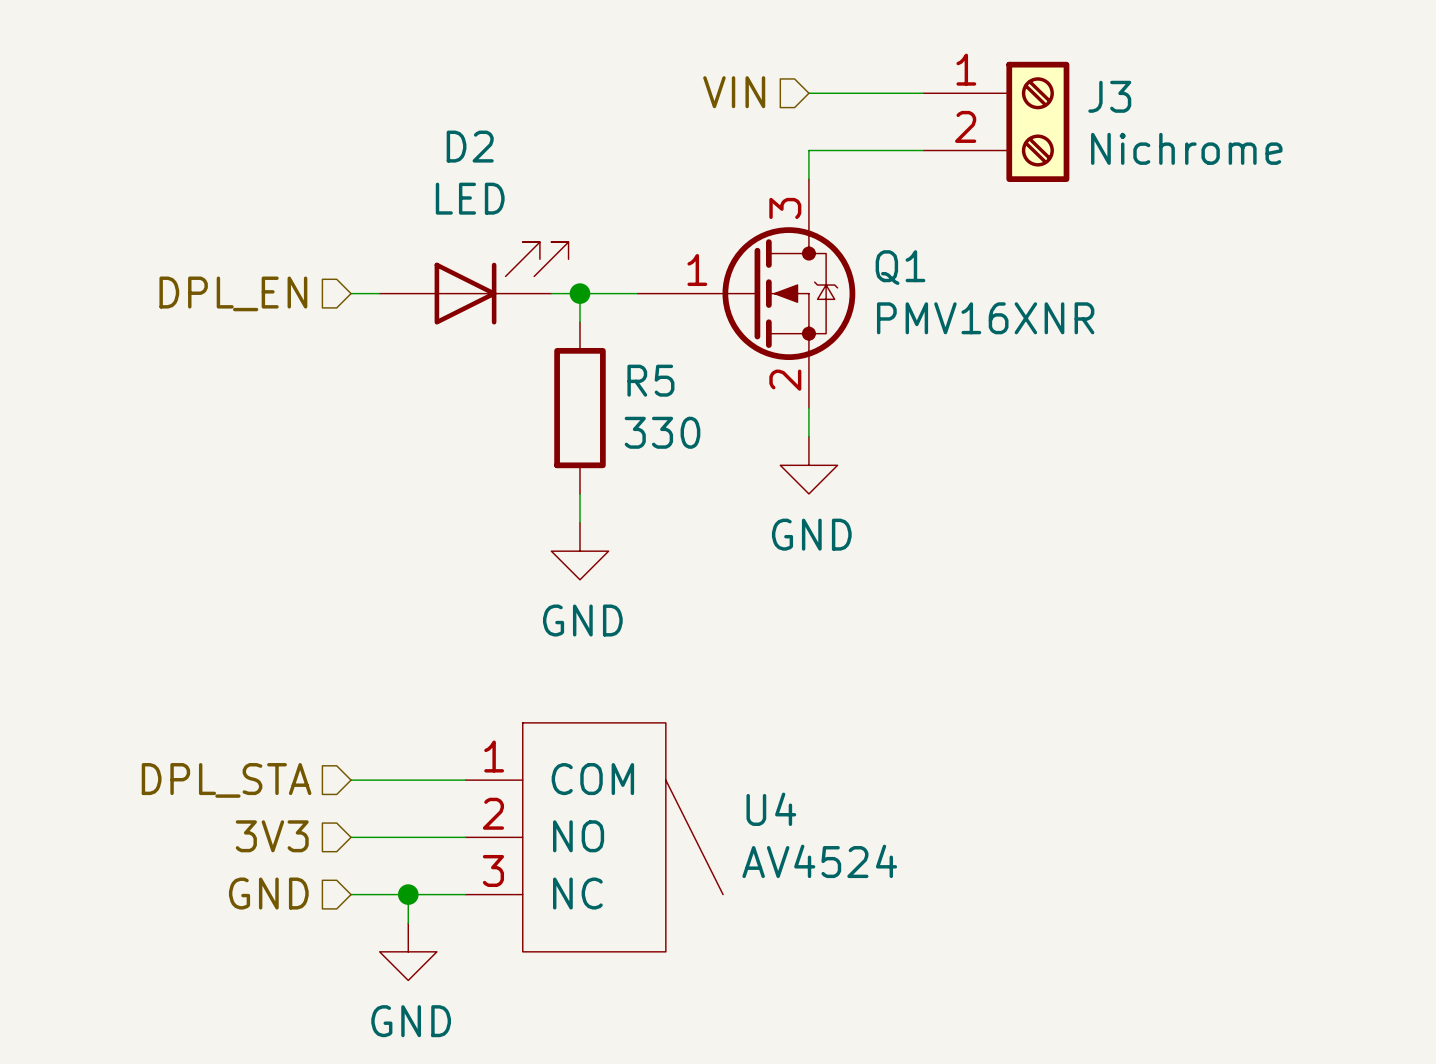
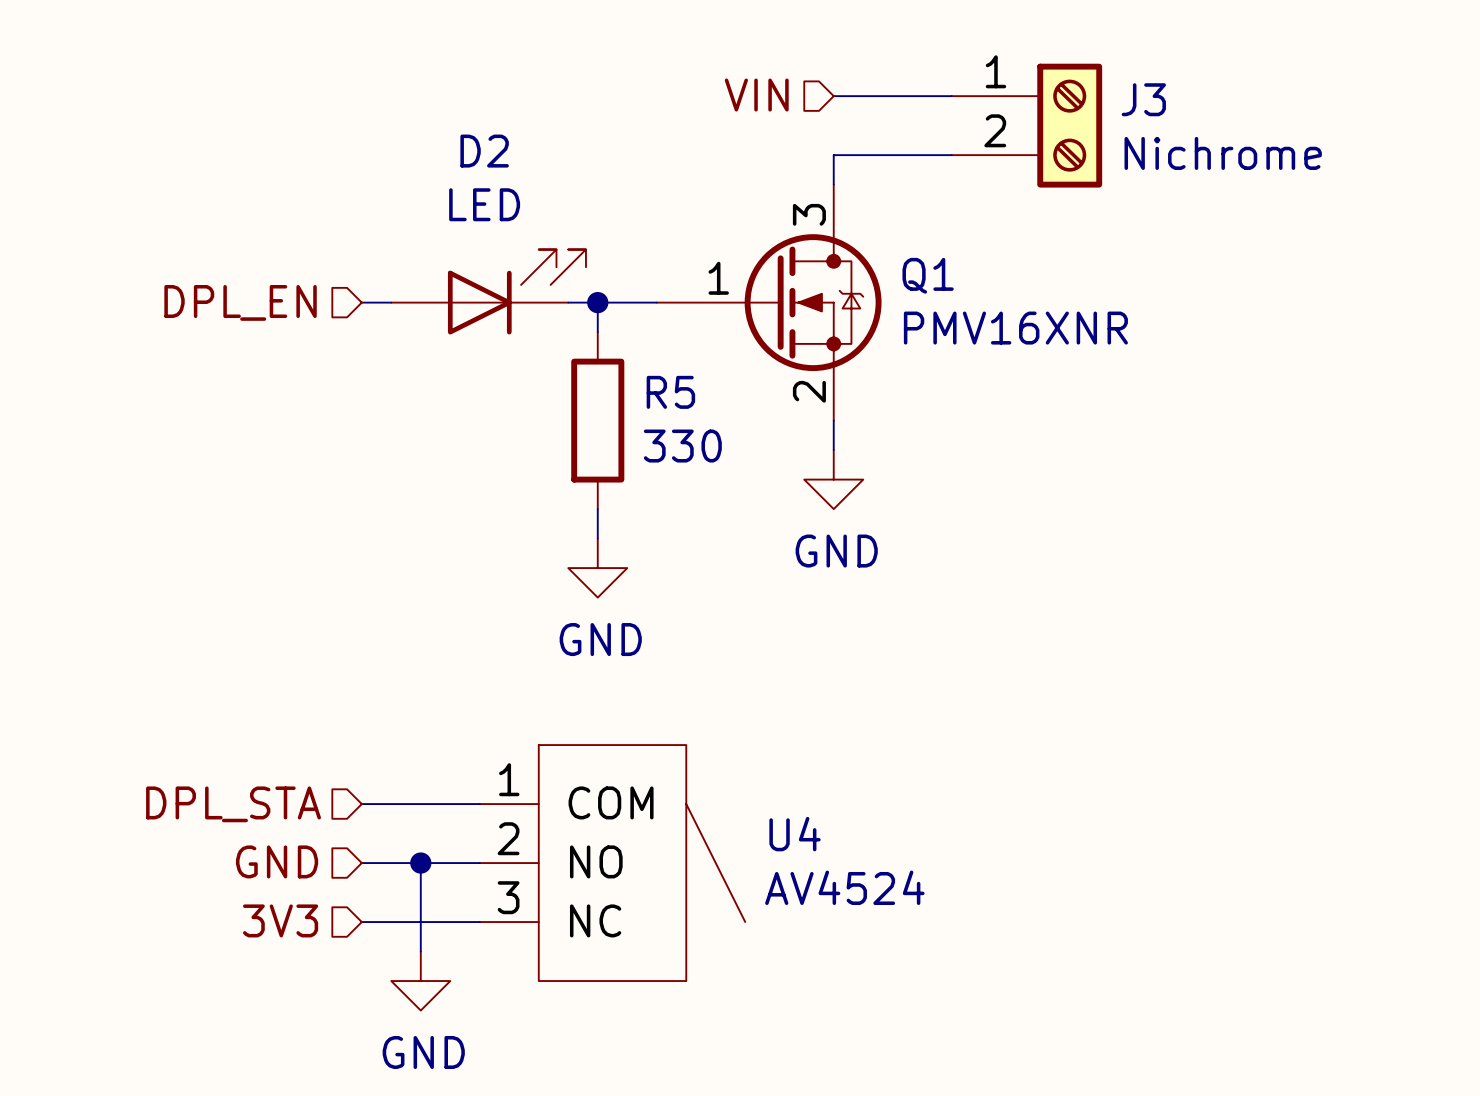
hierarchical label: 3V3 (272, 836) -> GND (277, 861)
wire: none -> (420, 863) (420, 922)
hierarchical label: GND (268, 893) -> 3V3 (280, 920)
junction position: (408, 894) -> (420, 863)

